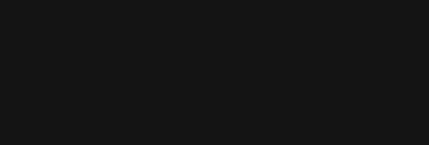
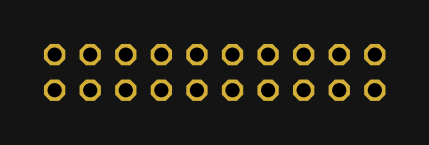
part: none -> (214, 72)

